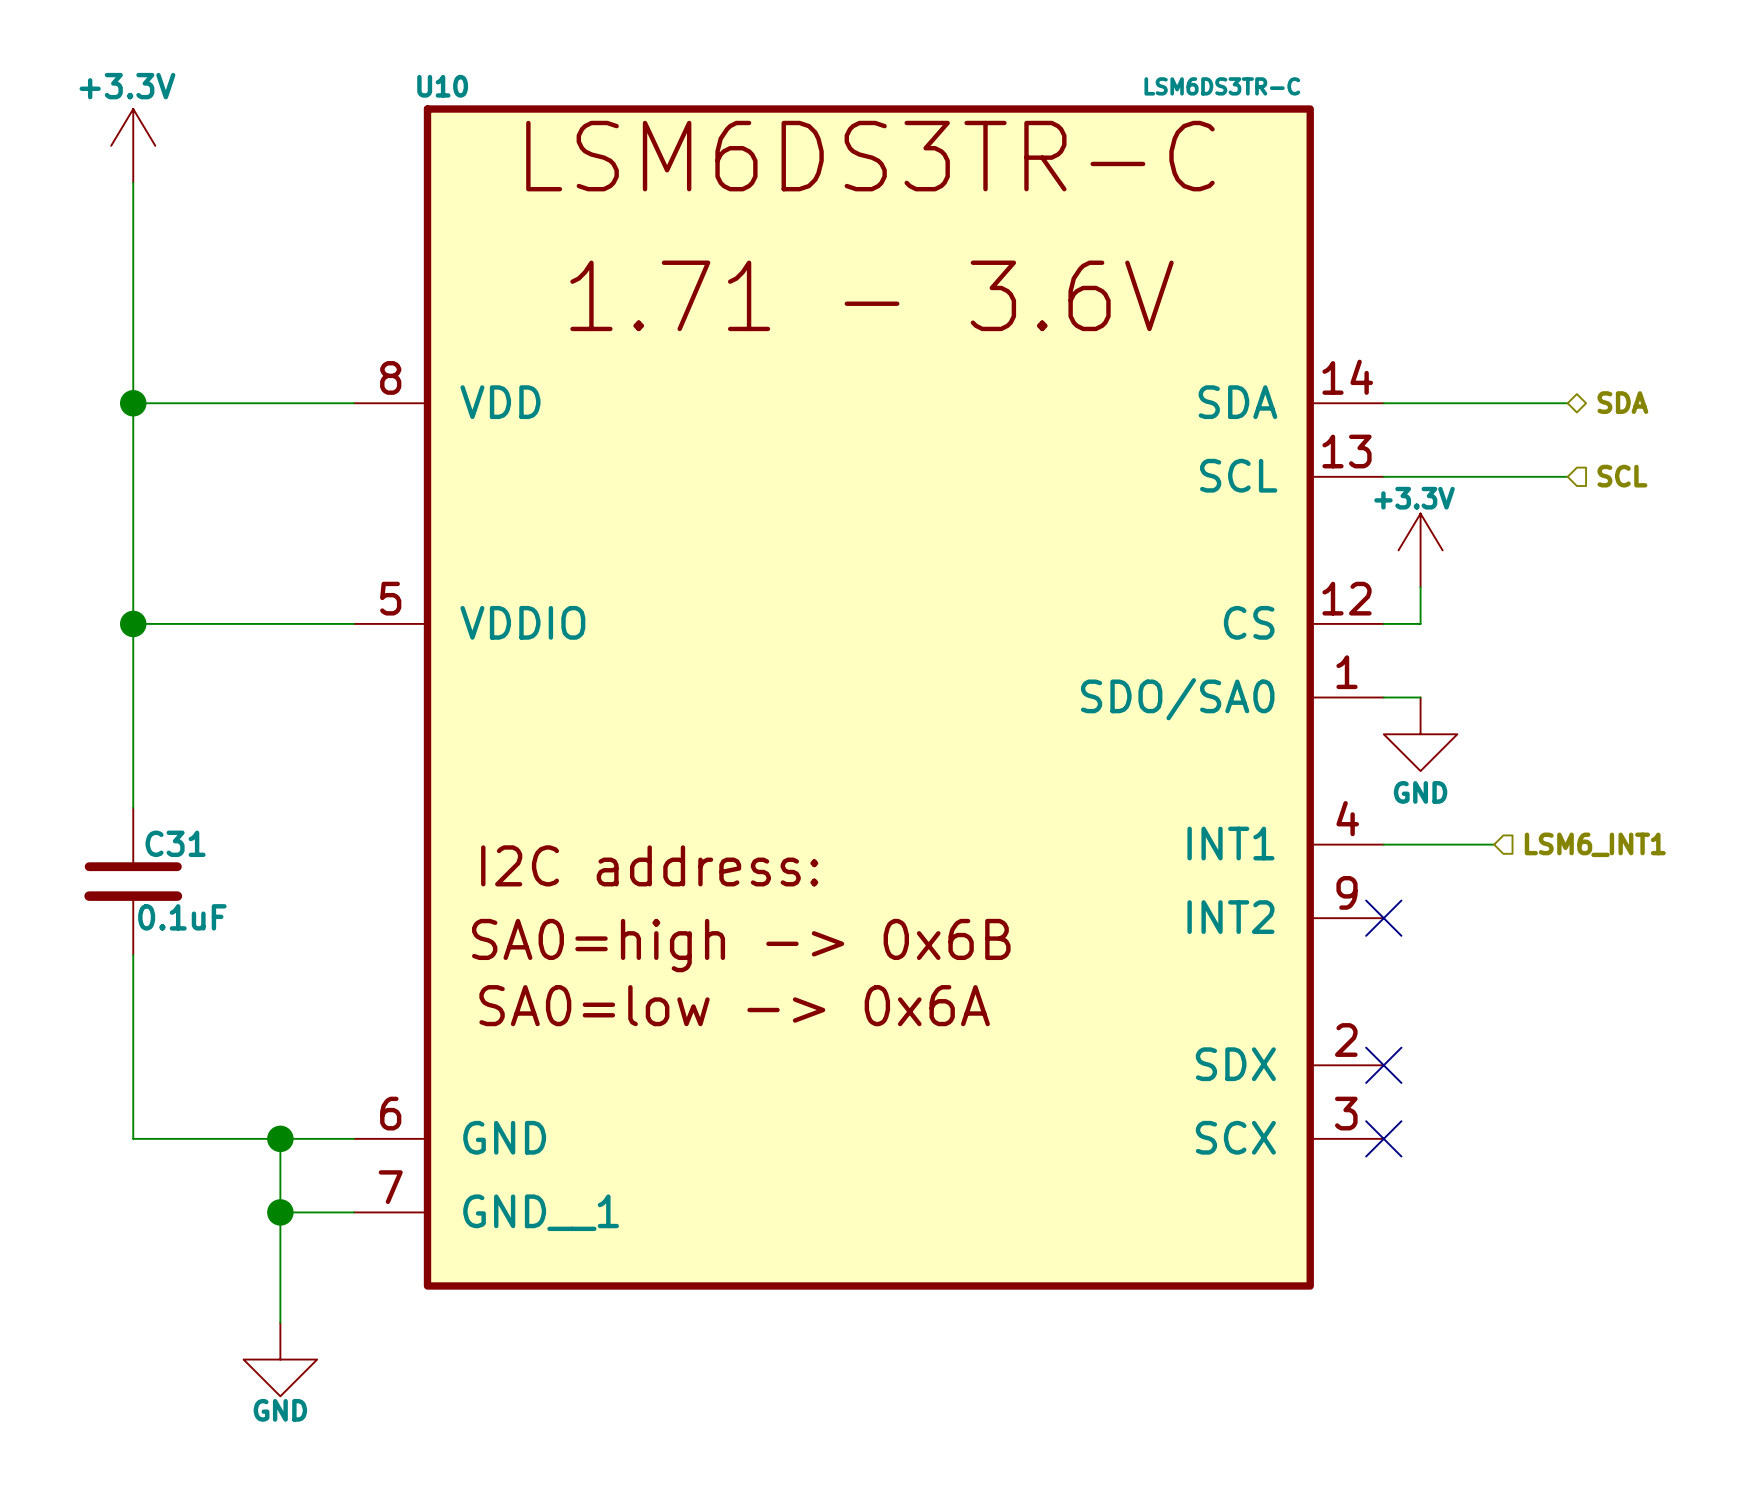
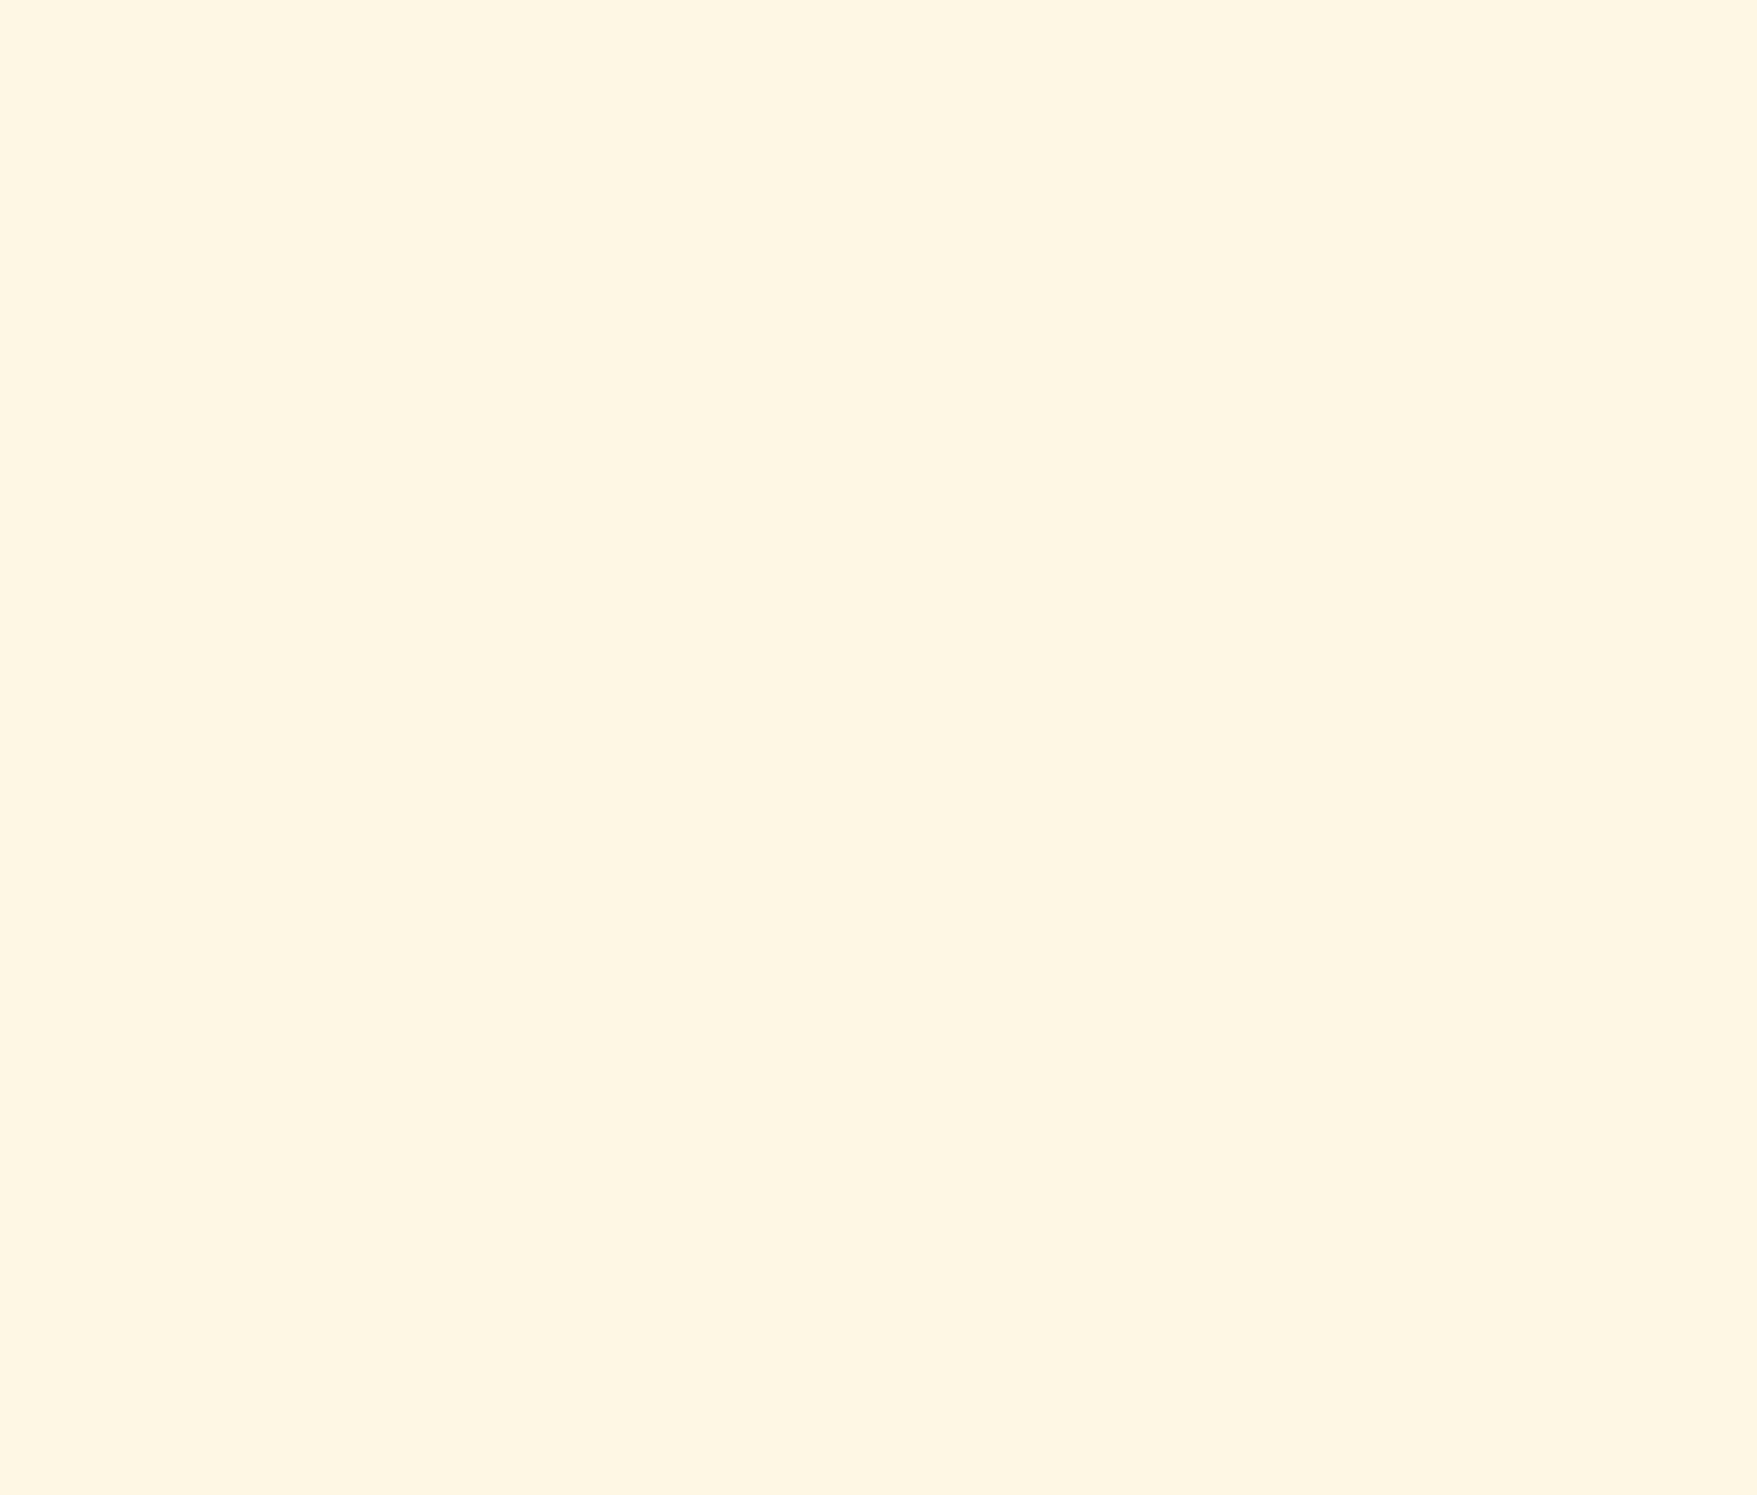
power symbol: +3.3V (133, 145) -> none
wire: (133, 182) (133, 807) -> none
hierarchical label: SDA (1622, 402) -> none
wire: (133, 403) (353, 403) -> none
junction: (133, 403) -> none
wire: (1383, 403) (1567, 403) -> none
wire: (1383, 476) (1567, 476) -> none
hierarchical label: SCL (1622, 476) -> none
power symbol: +3.3V (1420, 550) -> none
wire: (1420, 587) (1420, 623) (1383, 623) -> none
wire: (133, 623) (353, 623) -> none
junction: (133, 623) -> none
U10: LSM6DS3TR-C (868, 697) -> none
wire: (1383, 697) (1420, 697) -> none
power symbol: GND (1420, 734) -> none
wire: (1383, 844) (1494, 844) -> none
hierarchical label: LSM6_INT1 (1595, 844) -> none
C31: 0.1uF (133, 881) -> none
no-connect mark: (1383, 918) -> none
wire: (133, 954) (133, 1138) (353, 1138) -> none
no-connect mark: (1383, 1065) -> none
wire: (280, 1138) (280, 1322) -> none
junction: (280, 1138) -> none
no-connect mark: (1383, 1138) -> none
wire: (280, 1212) (353, 1212) -> none
junction: (280, 1212) -> none
power symbol: GND (280, 1359) -> none

